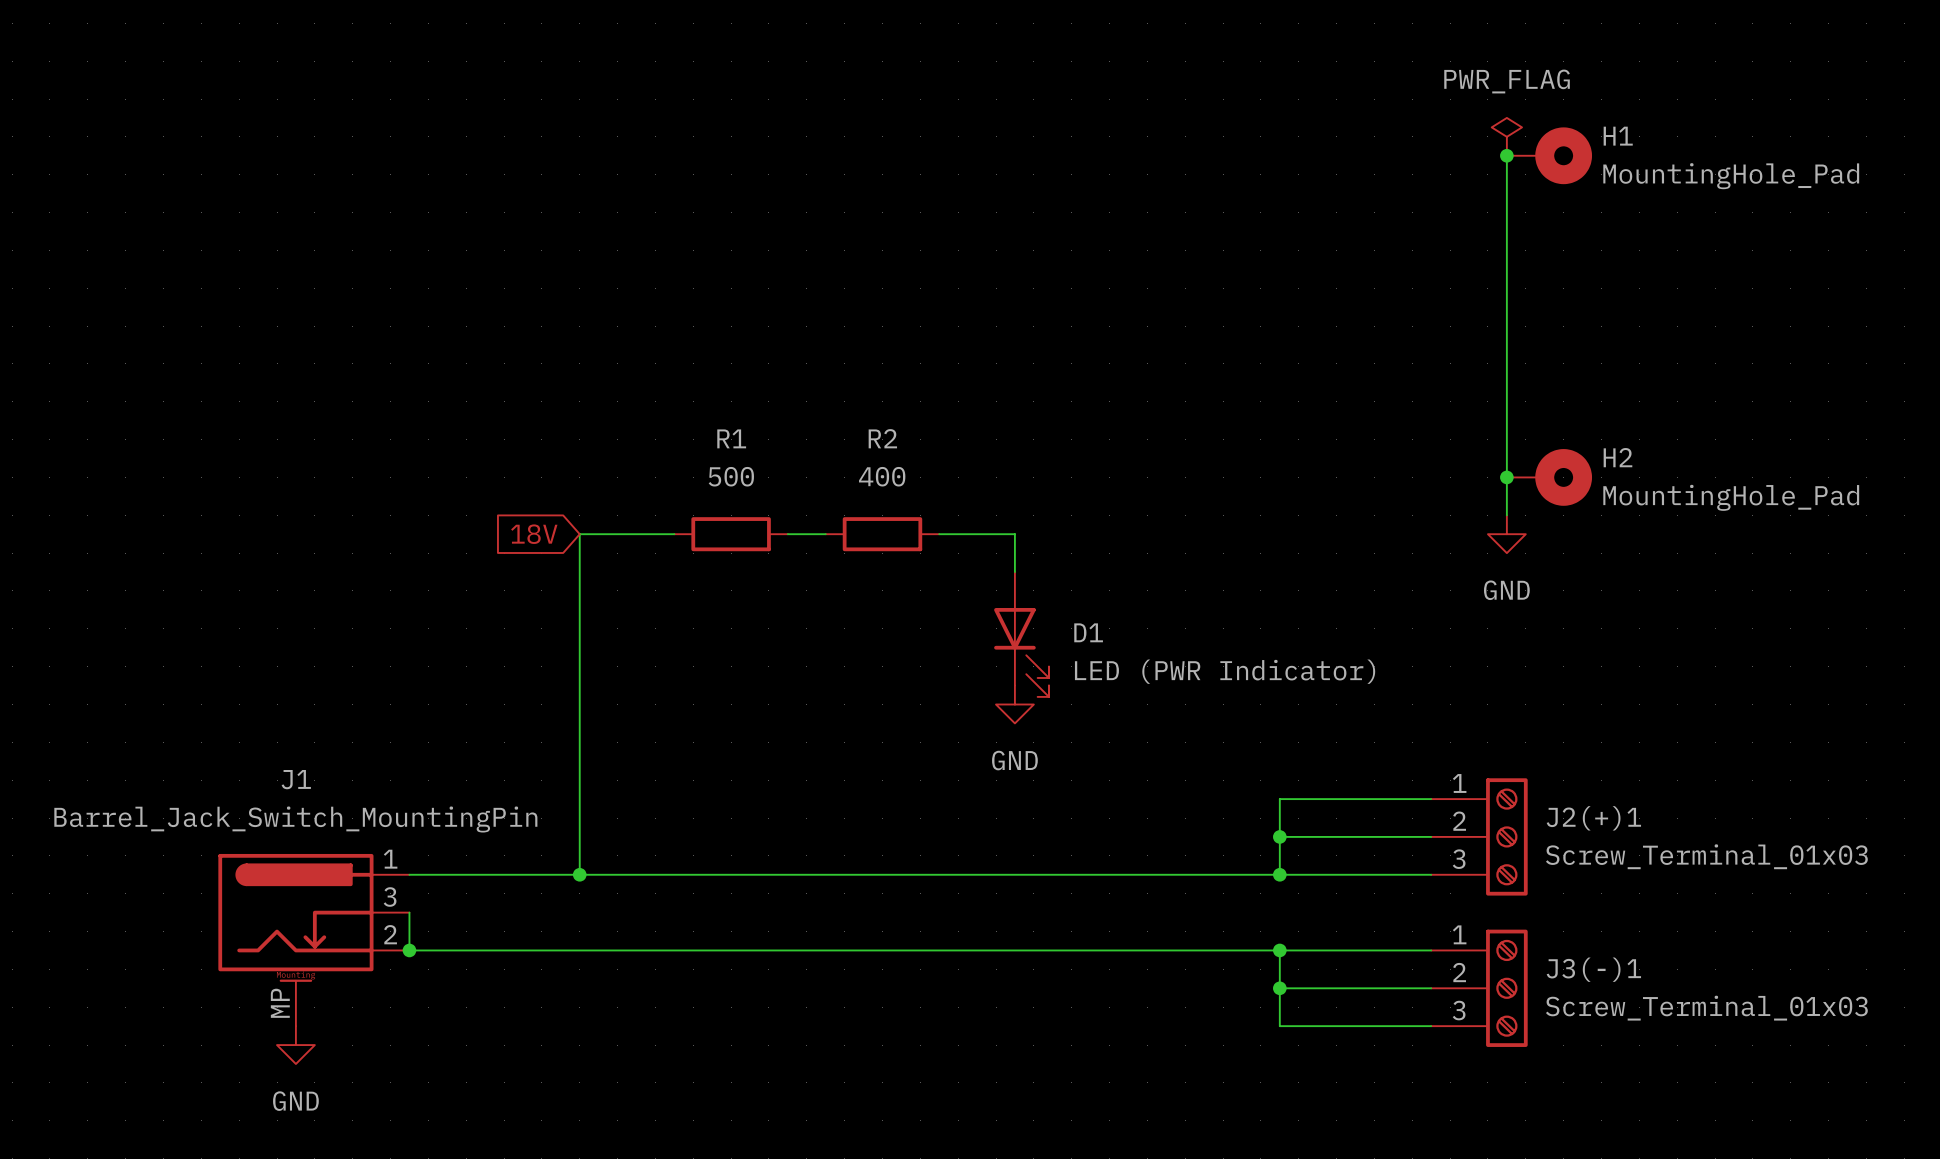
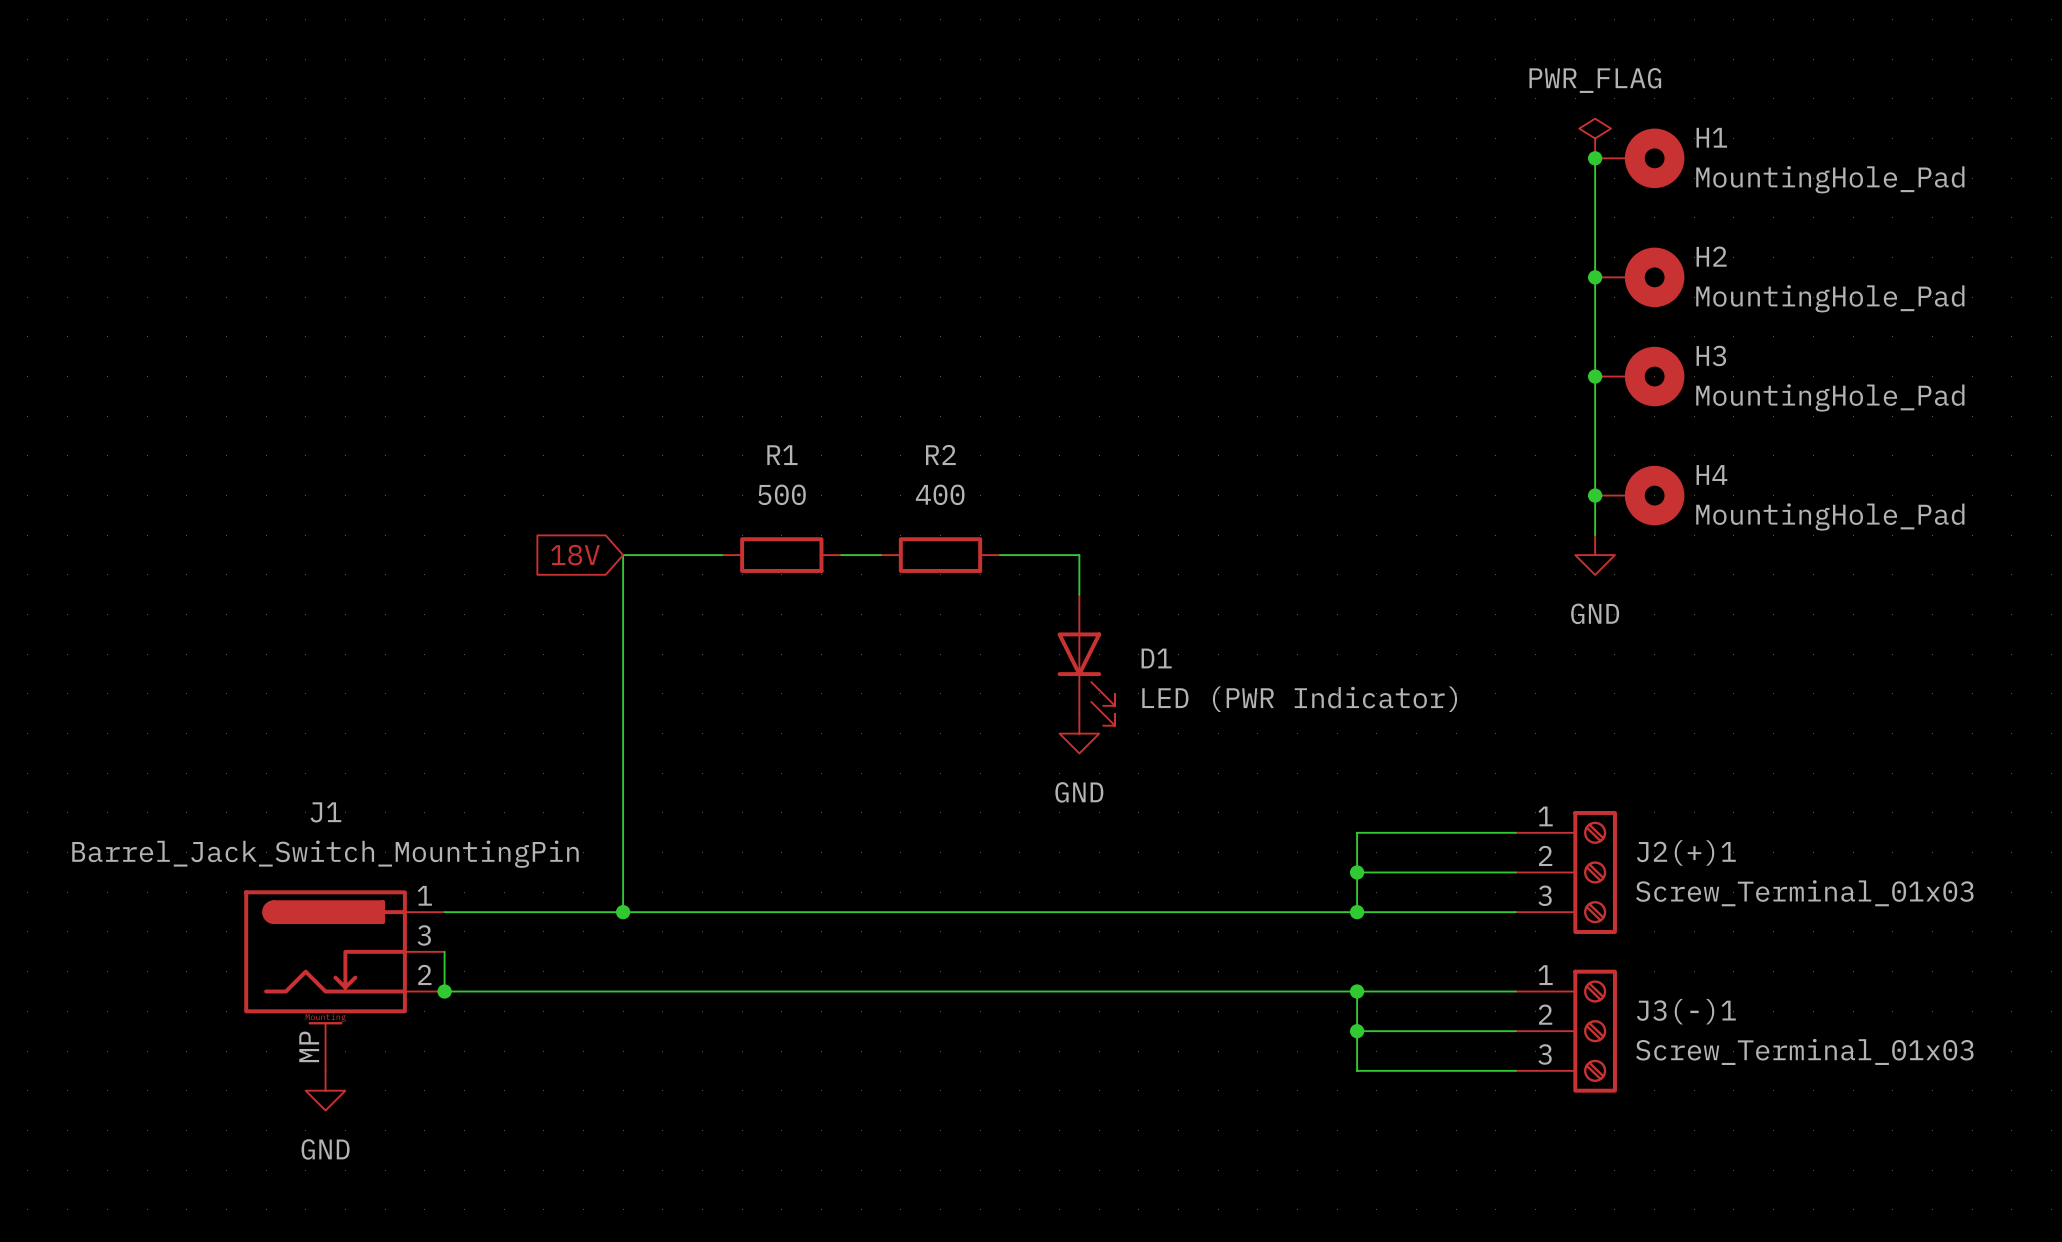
junction: none -> (1595, 277)
H2: none -> MountingHole_Pad (1639, 277)
junction: none -> (1595, 376)
H3: none -> MountingHole_Pad (1639, 376)
H2 name: H2 (1617, 457) -> H4 (1711, 474)

